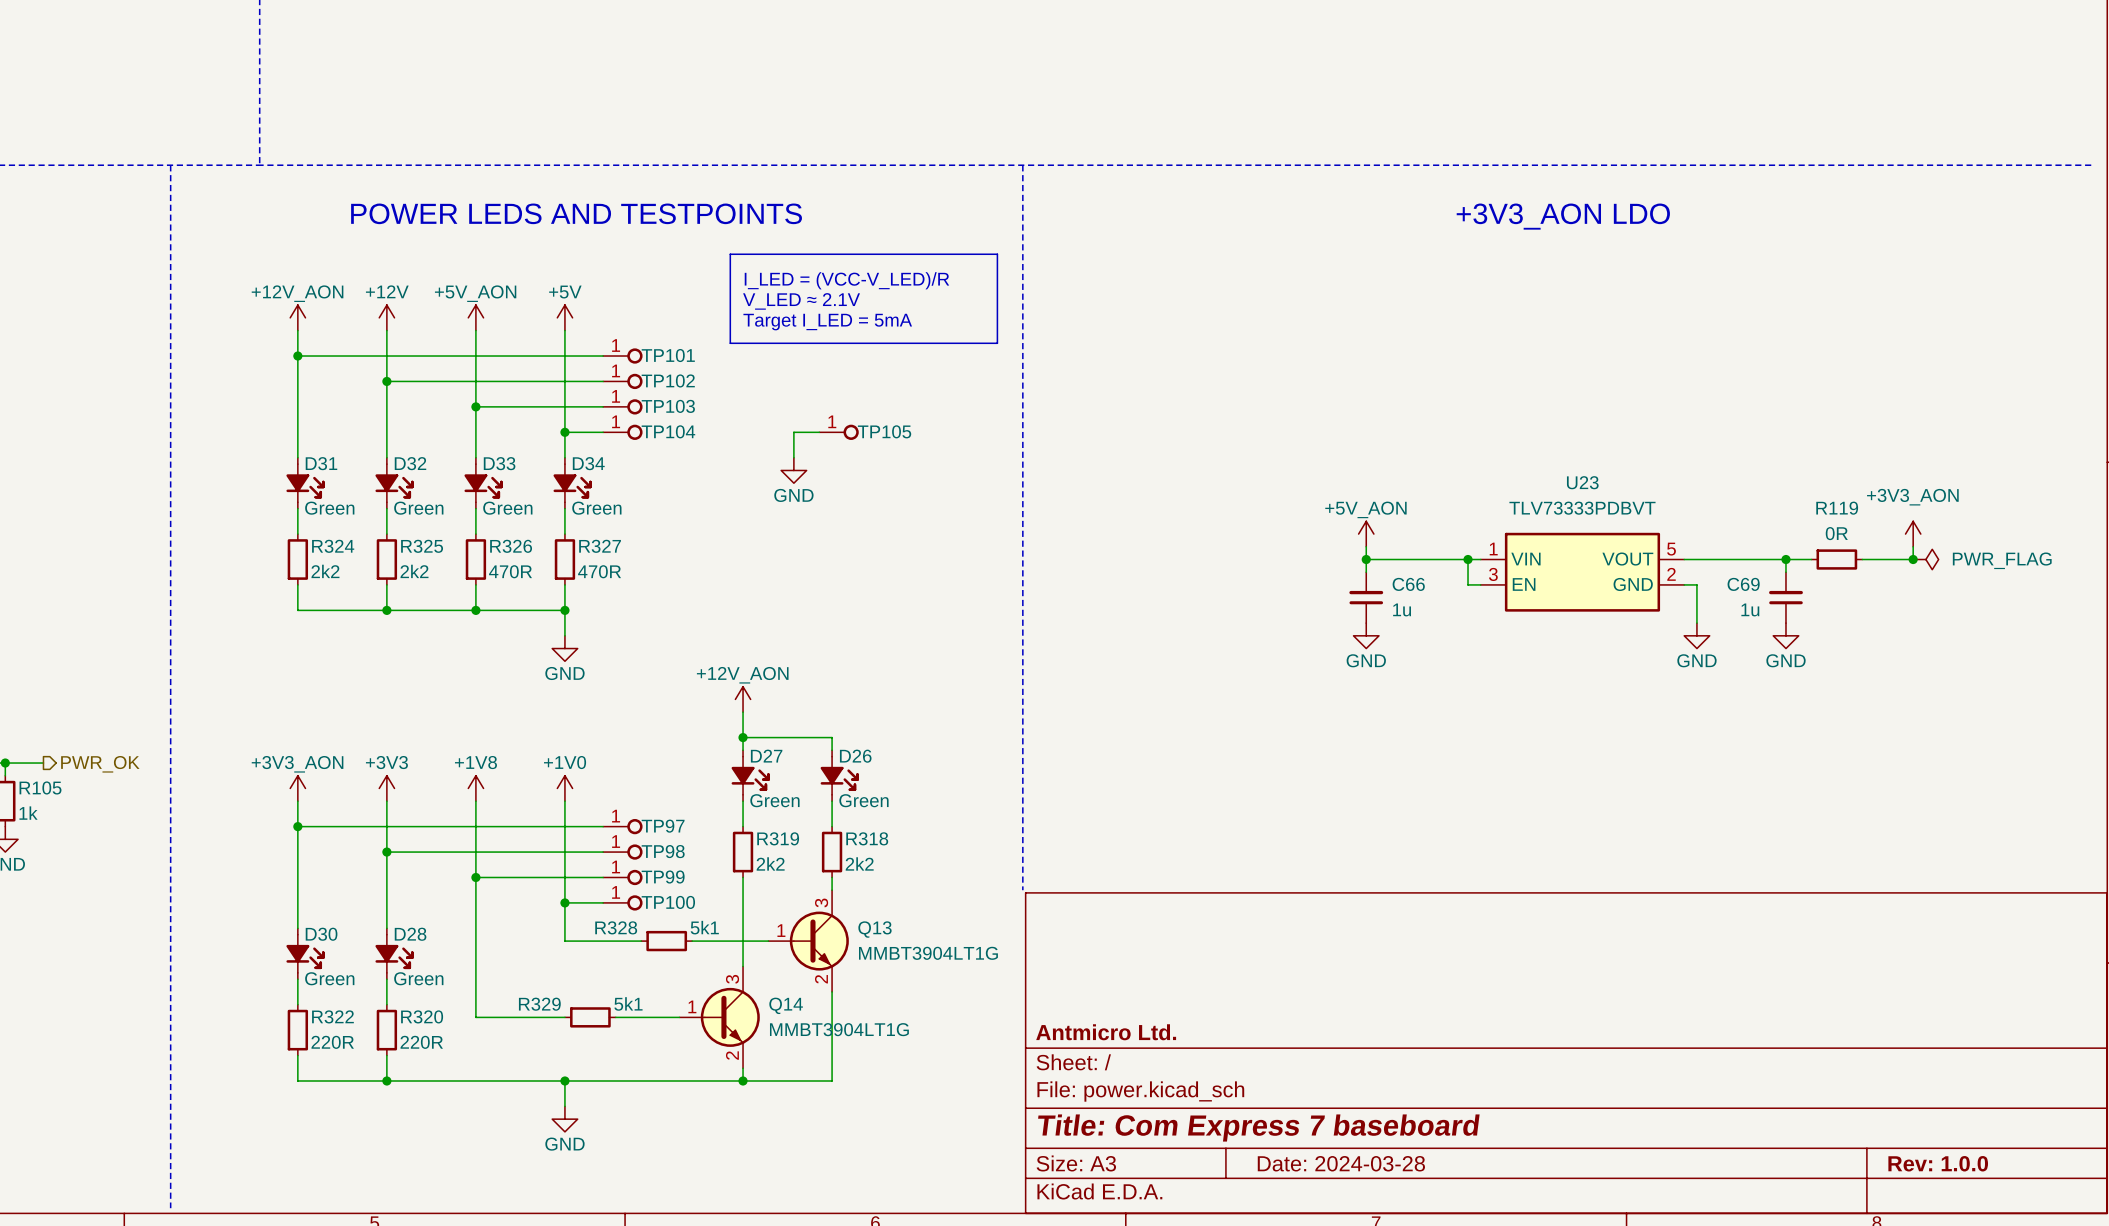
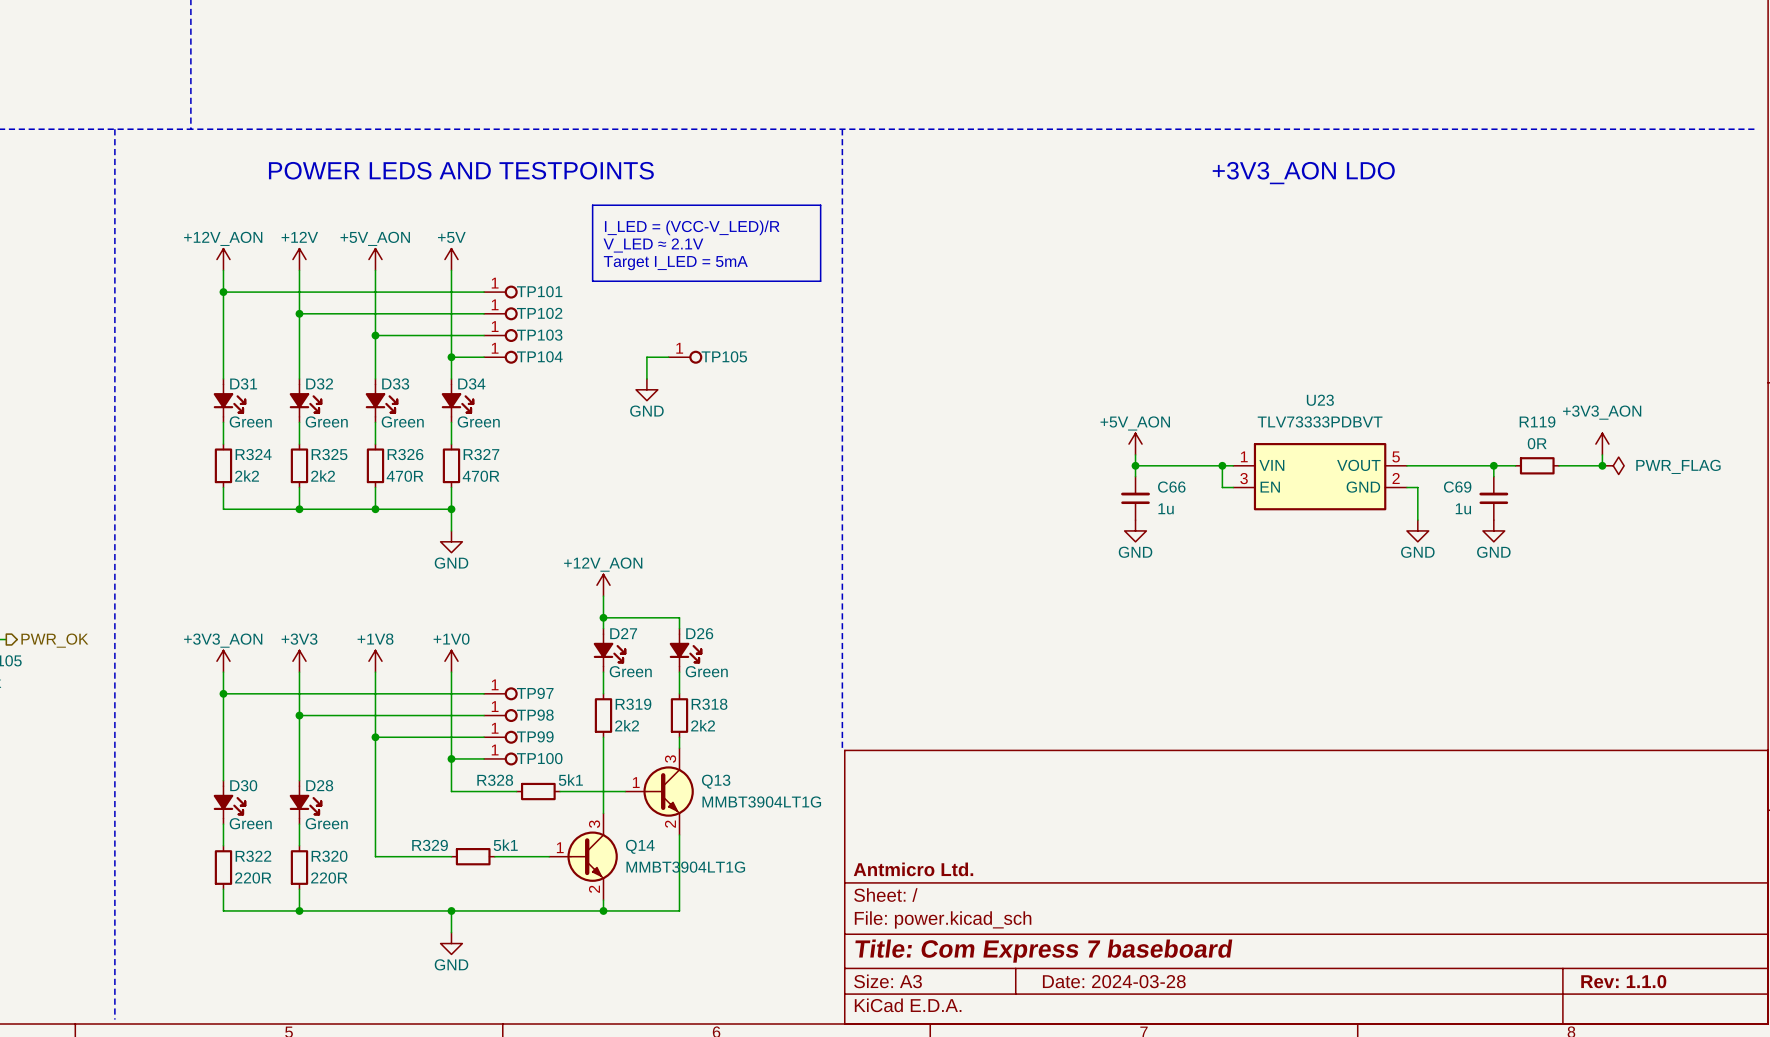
title block: Rev: 1.0.0 (1938, 1163) -> Rev: 1.1.0 (1623, 981)

